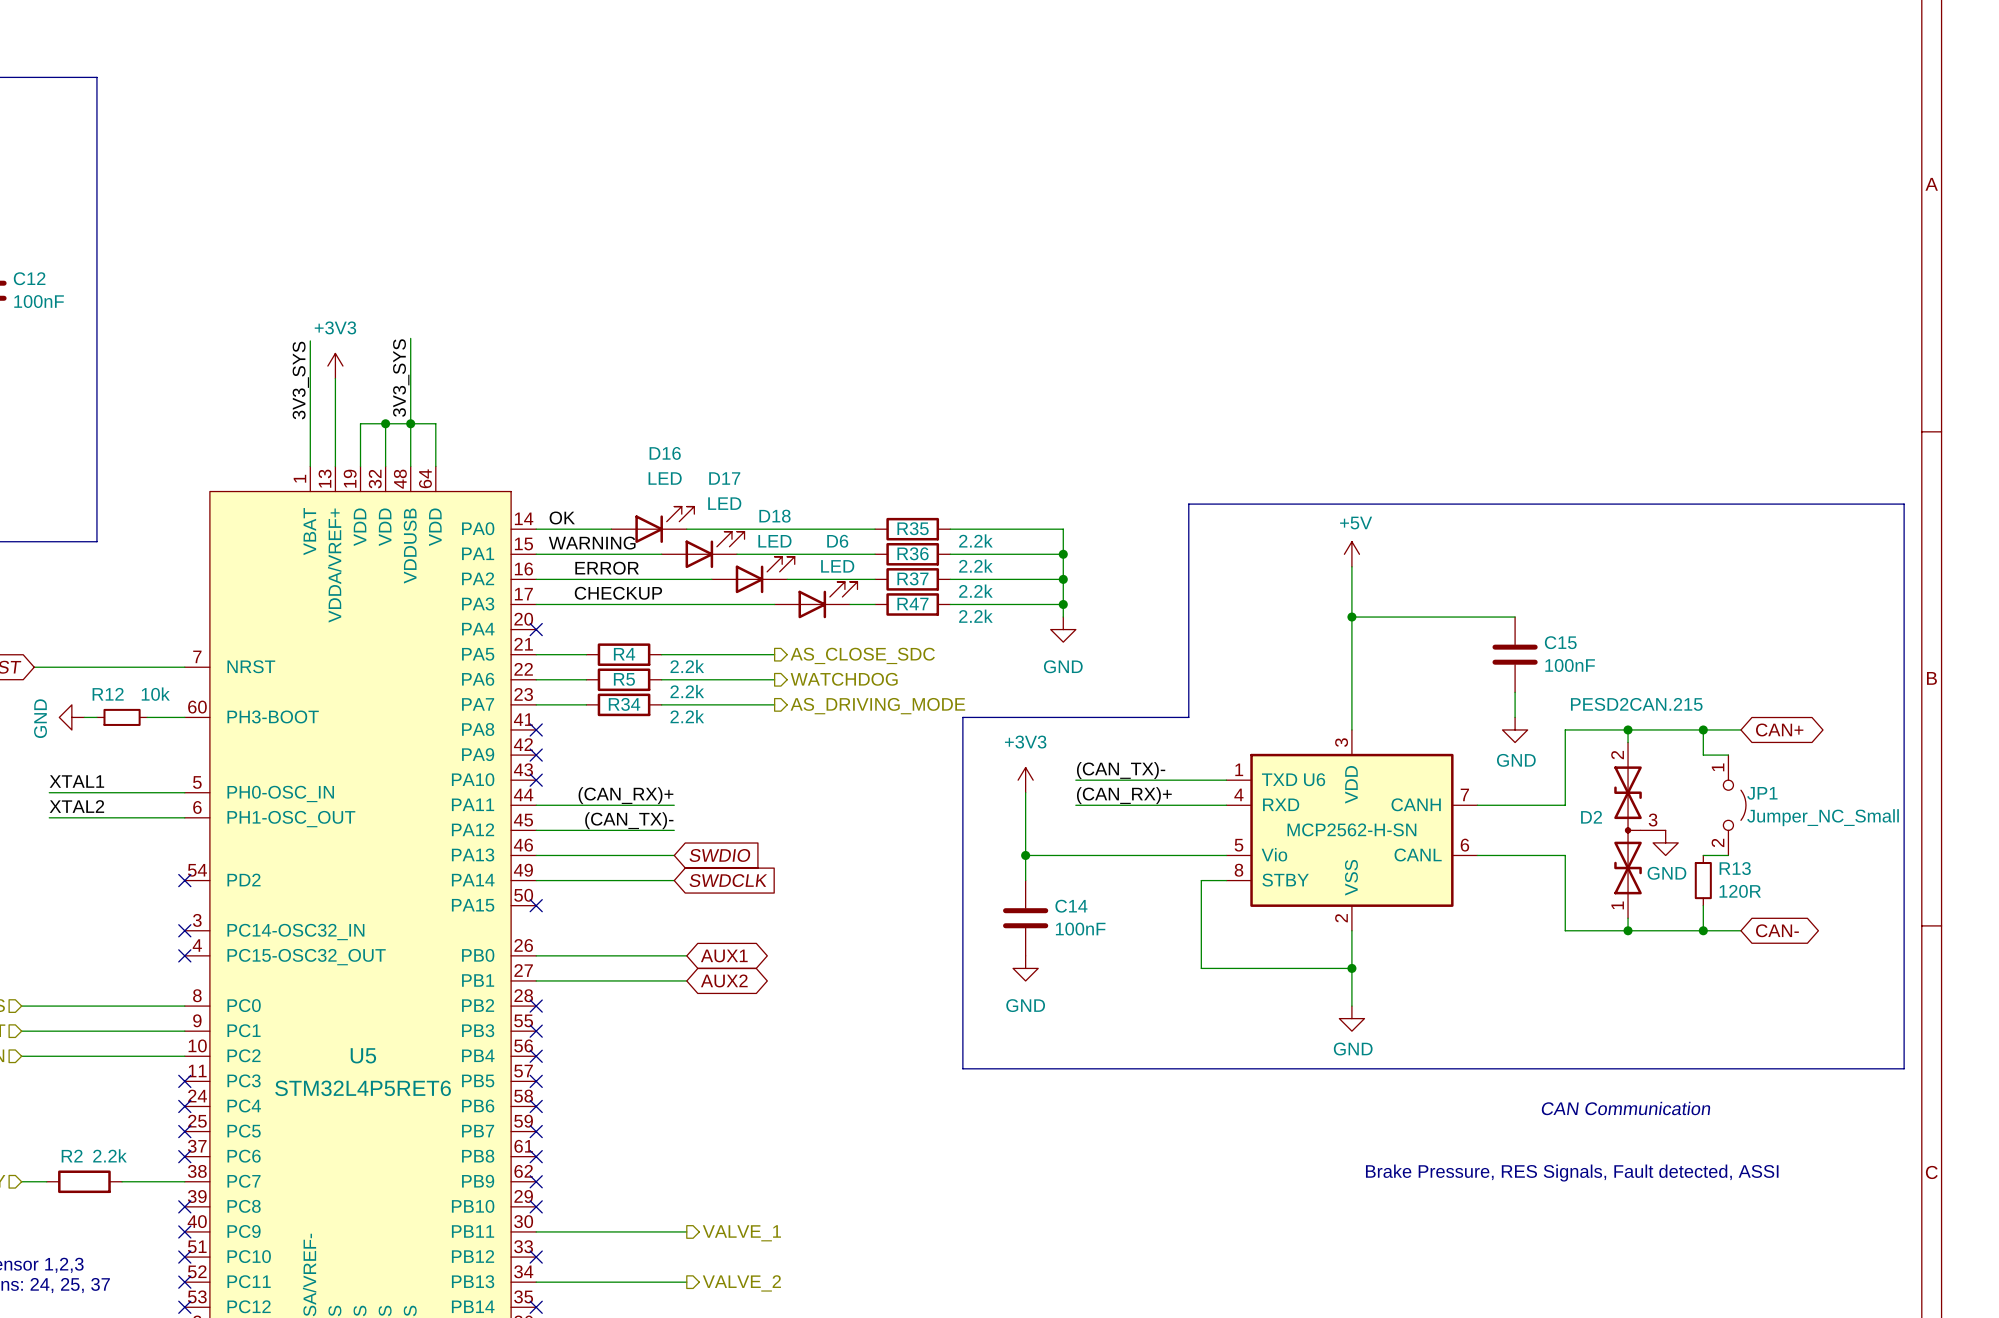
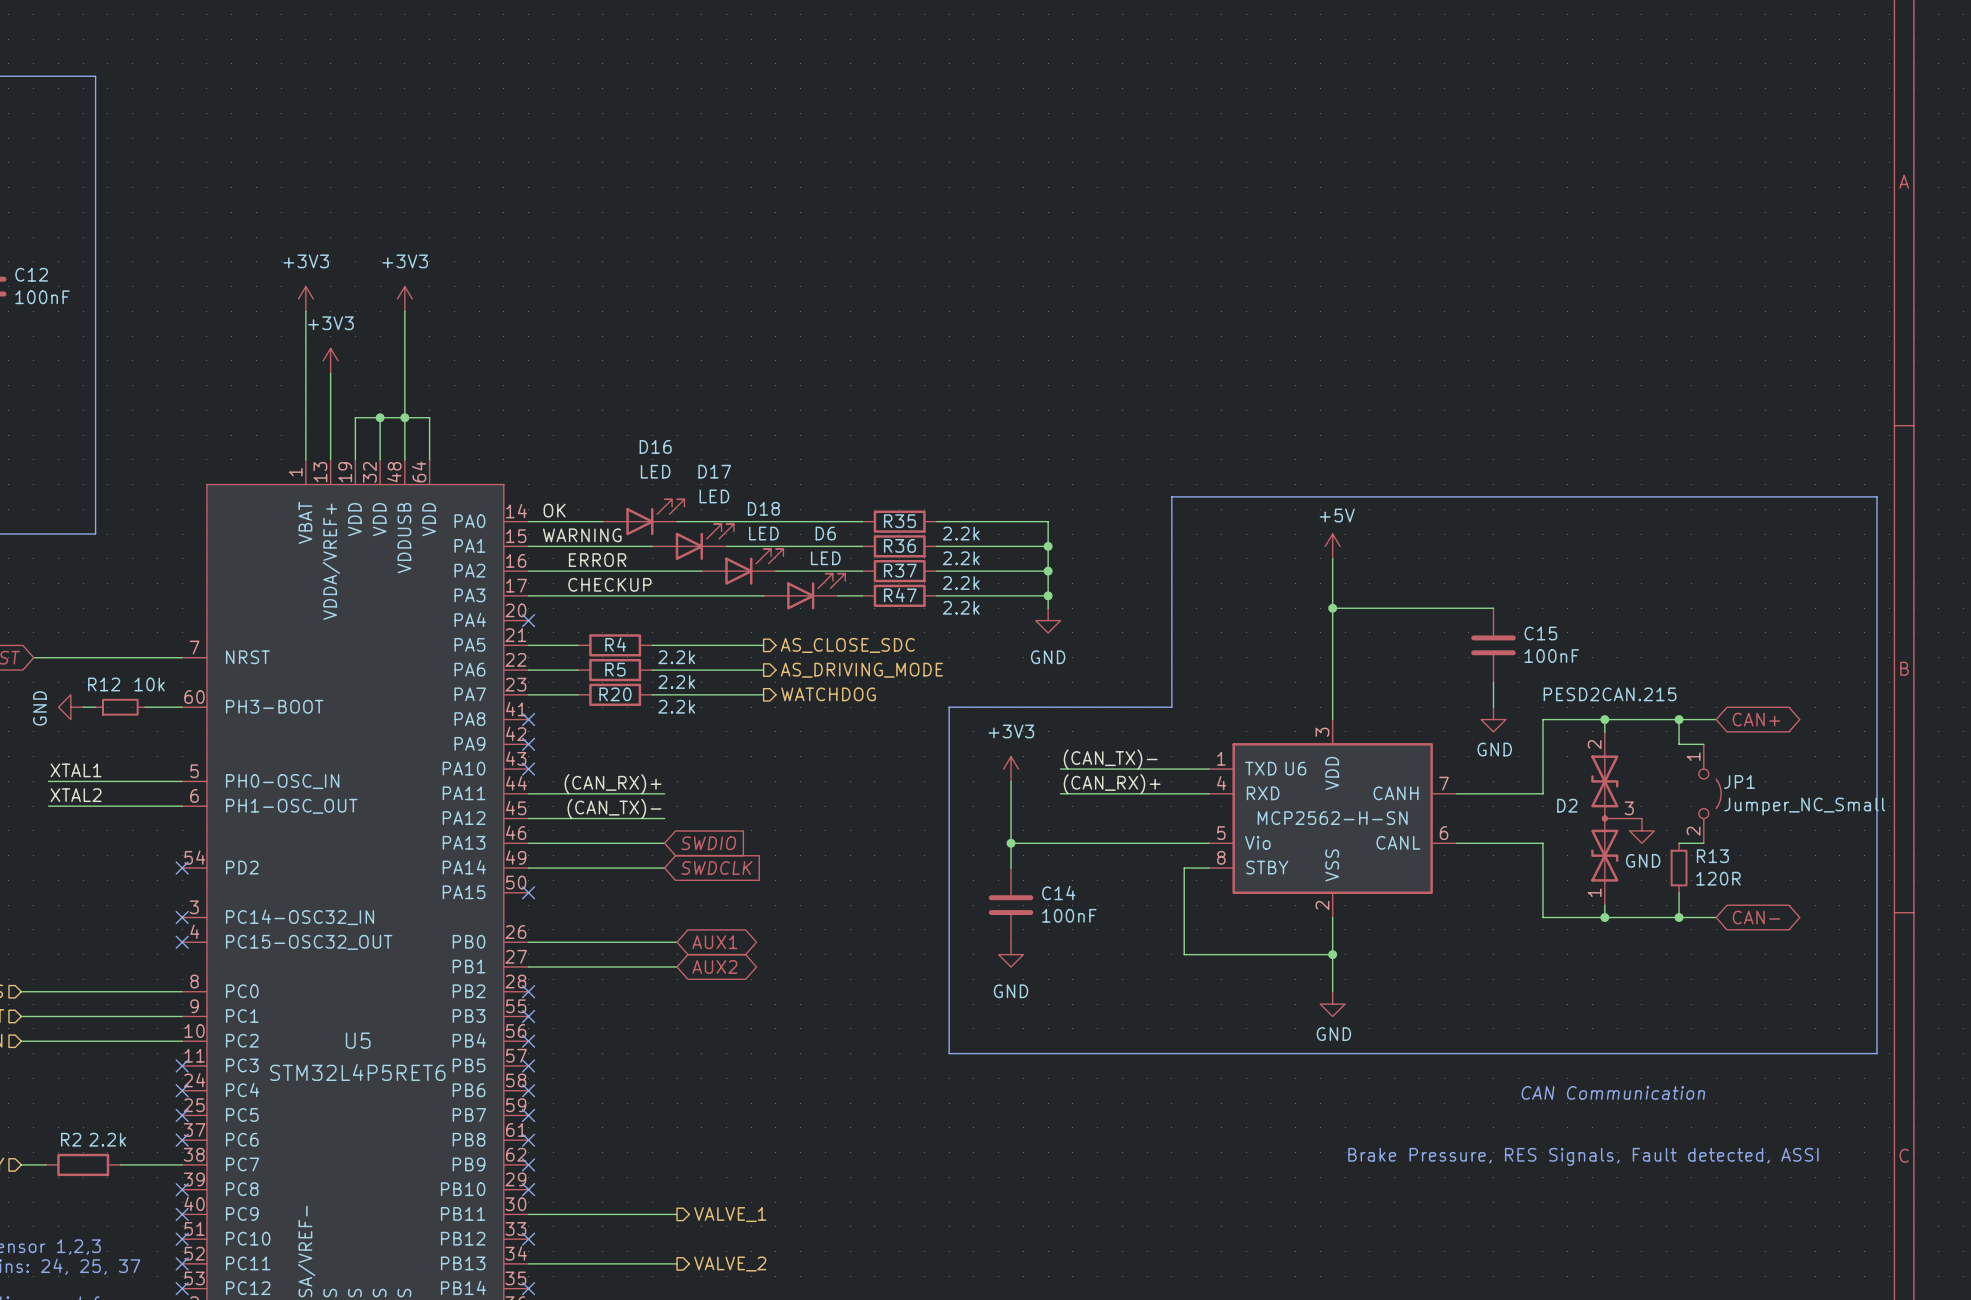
power symbol: none -> +3V3 (305, 298)
power symbol: none -> +3V3 (404, 298)
wire: none -> (305, 311) (305, 336)
wire: none -> (404, 311) (404, 333)
label: 3V3_SYS (401, 378) -> none
label: 3V3_SYS (300, 380) -> none
hierarchical label: WATCHDOG (844, 679) -> AS_DRIVING_MODE (861, 670)
R34 name: R34 (624, 704) -> R20 (615, 694)
hierarchical label: AS_DRIVING_MODE (877, 706) -> WATCHDOG (828, 694)

